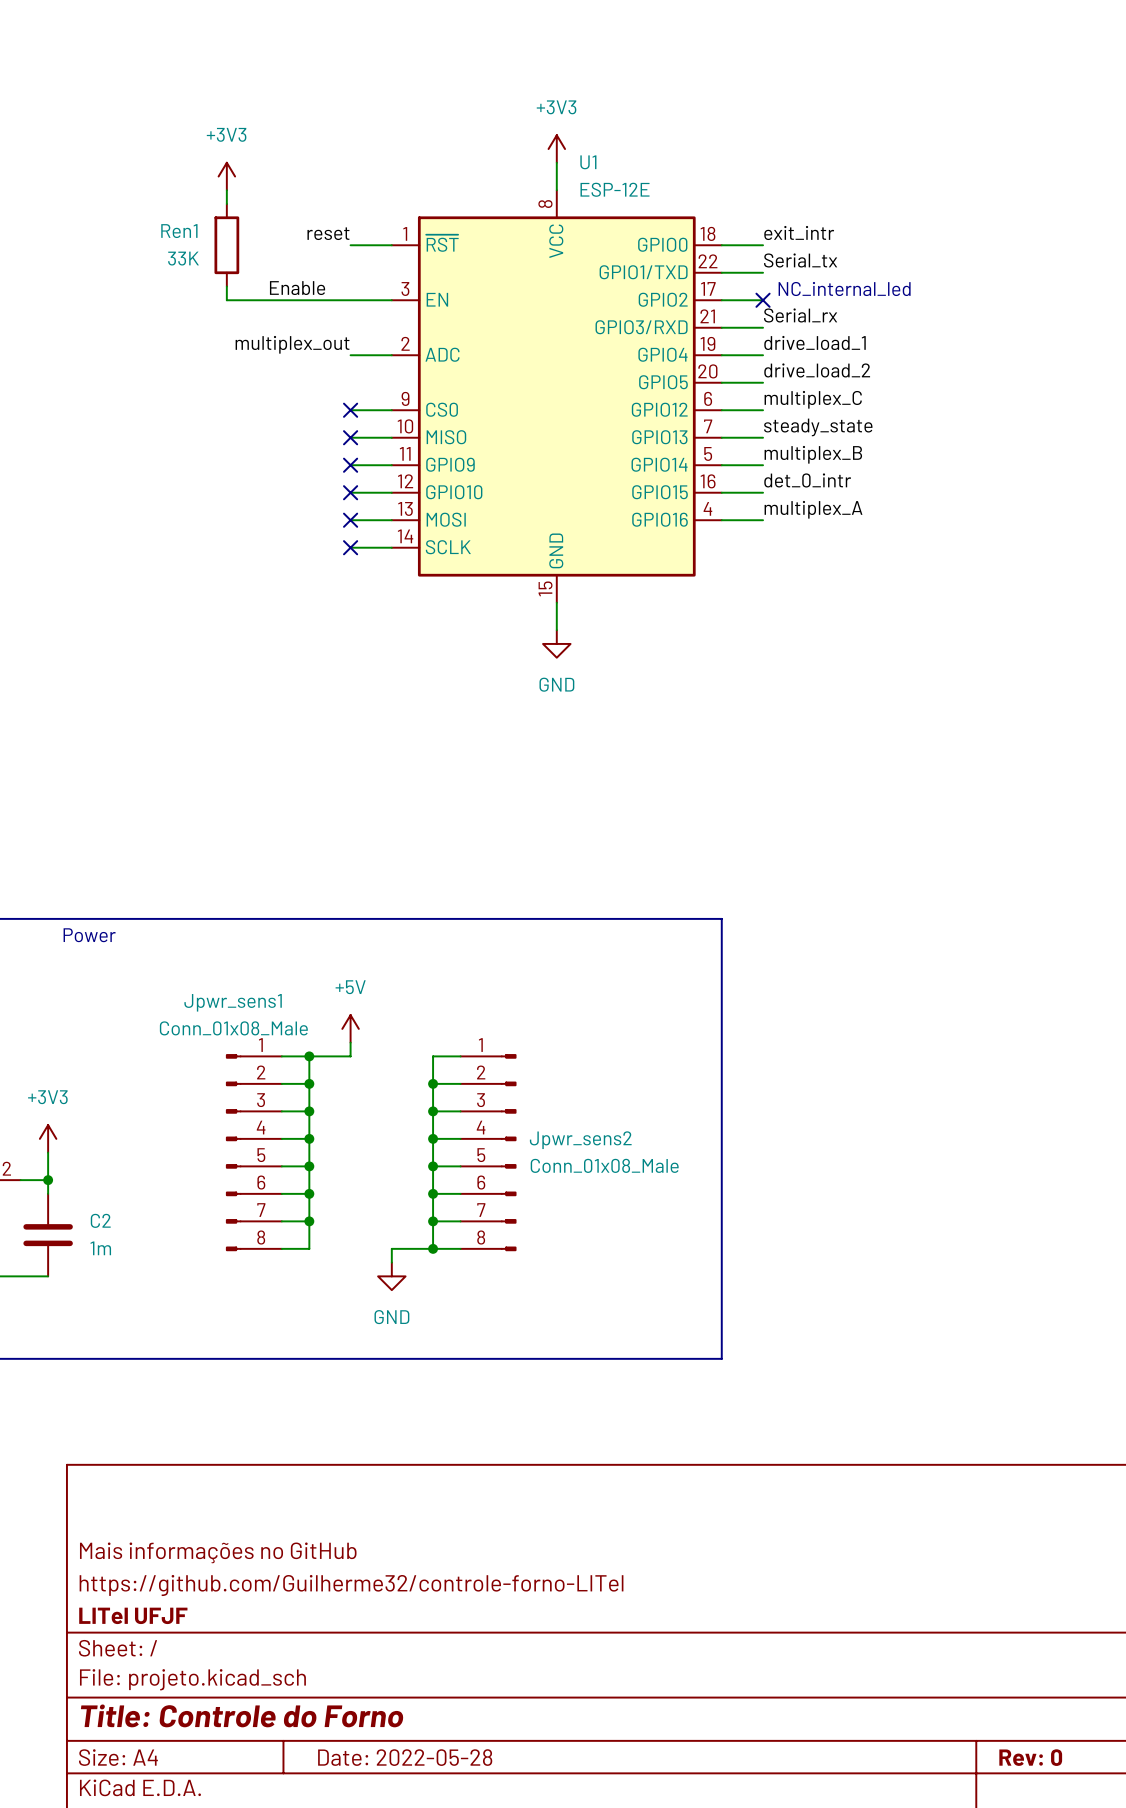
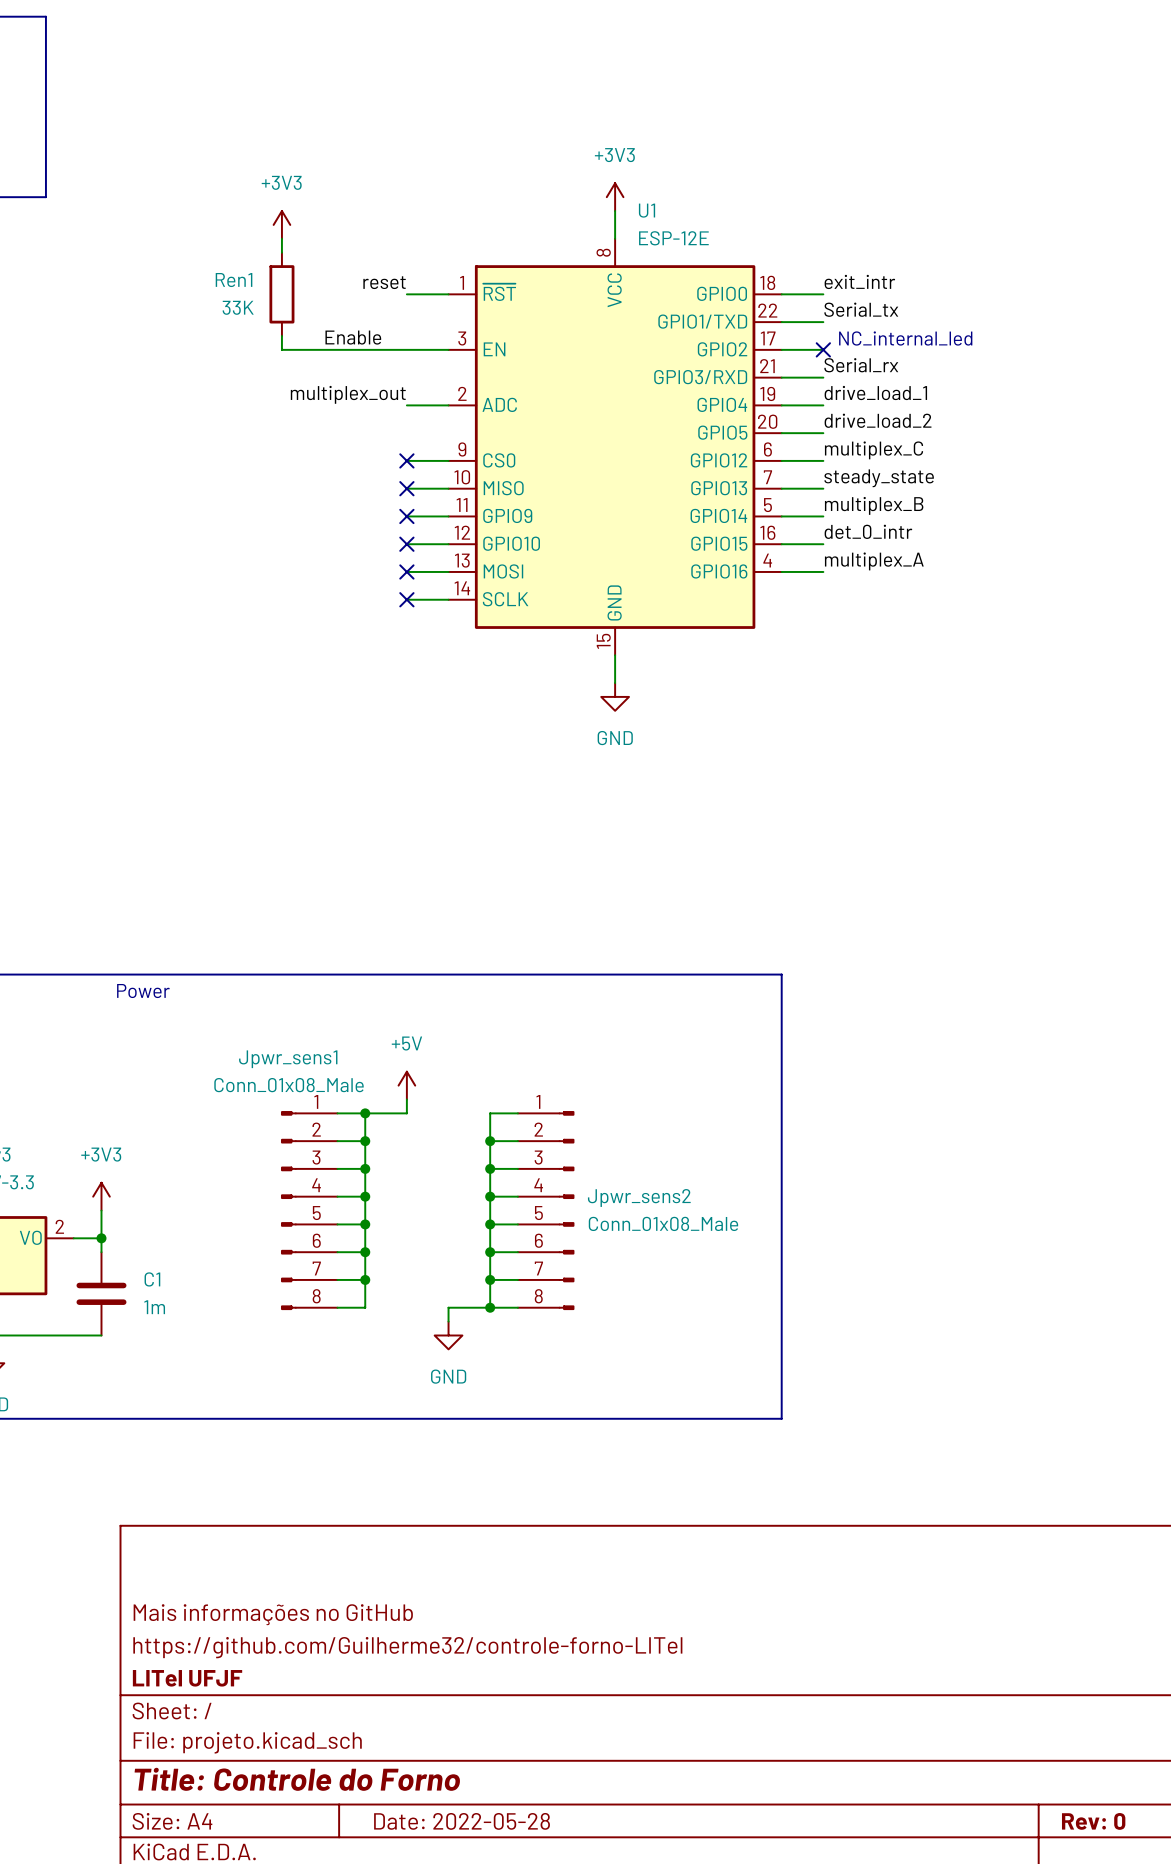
C2 name: C2 (100, 1220) -> C1 (152, 1279)

